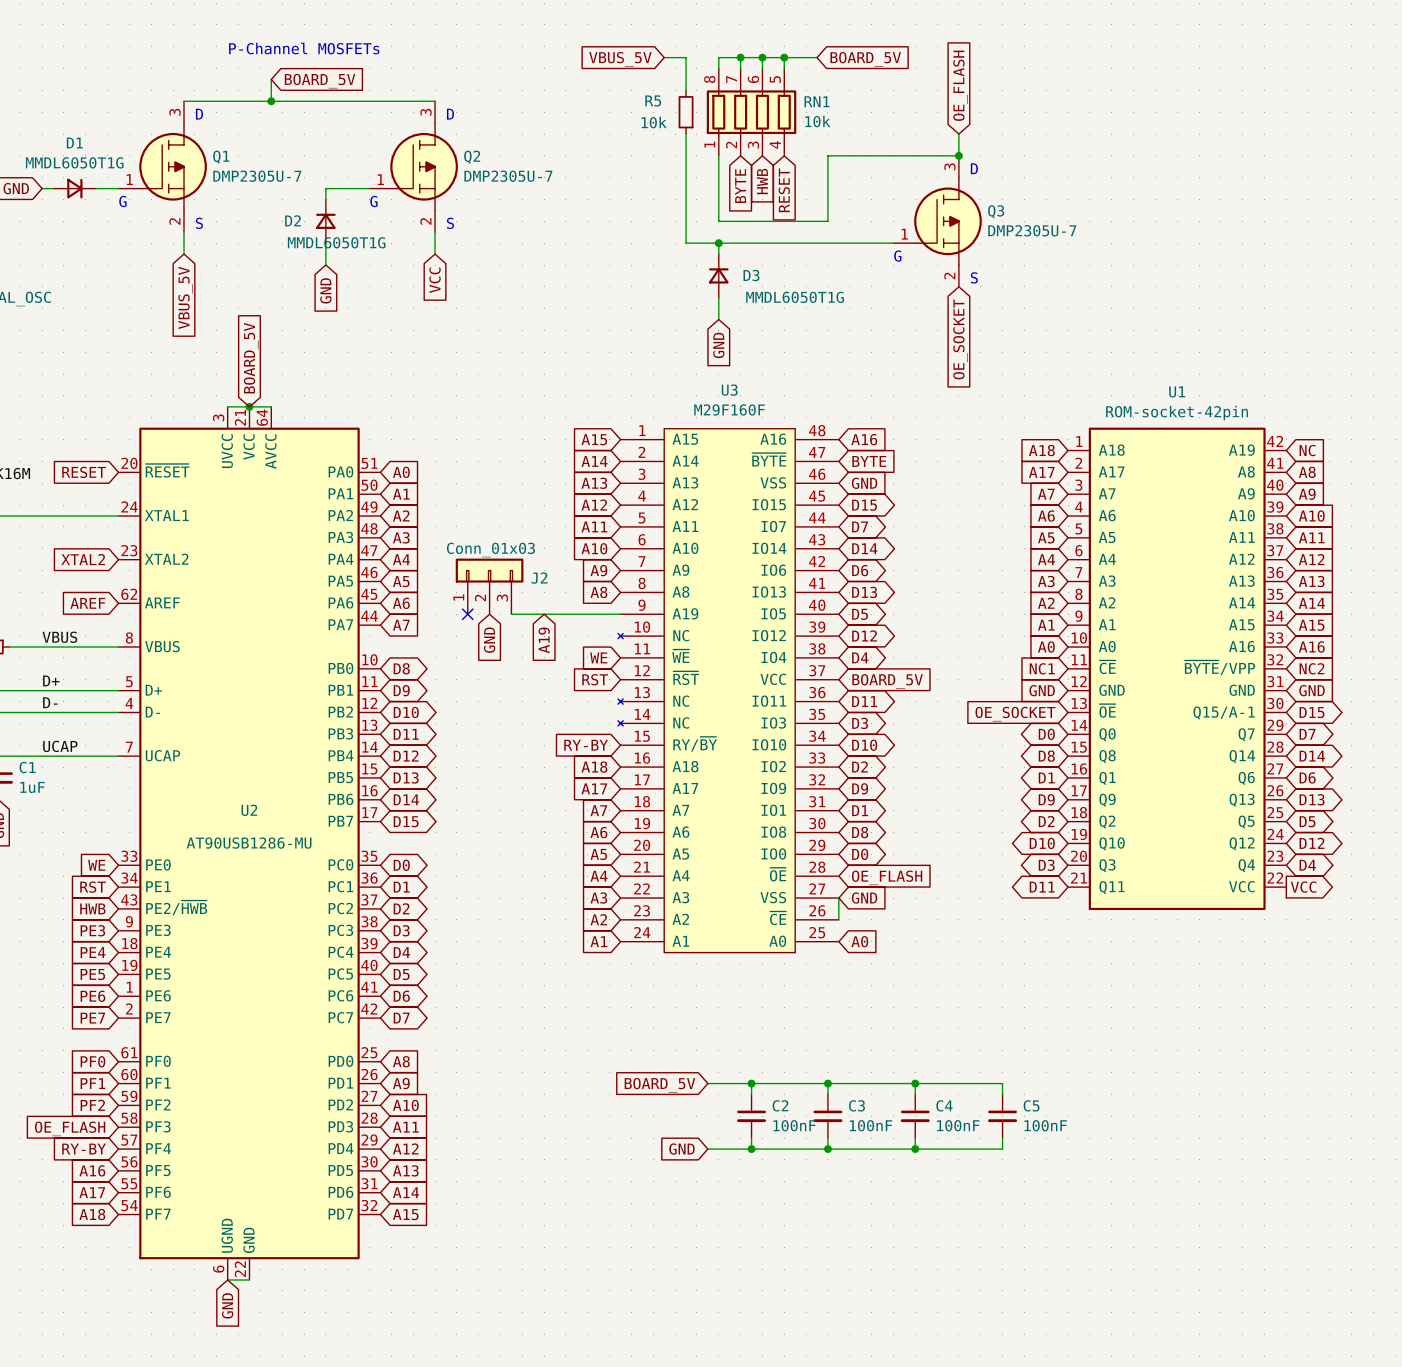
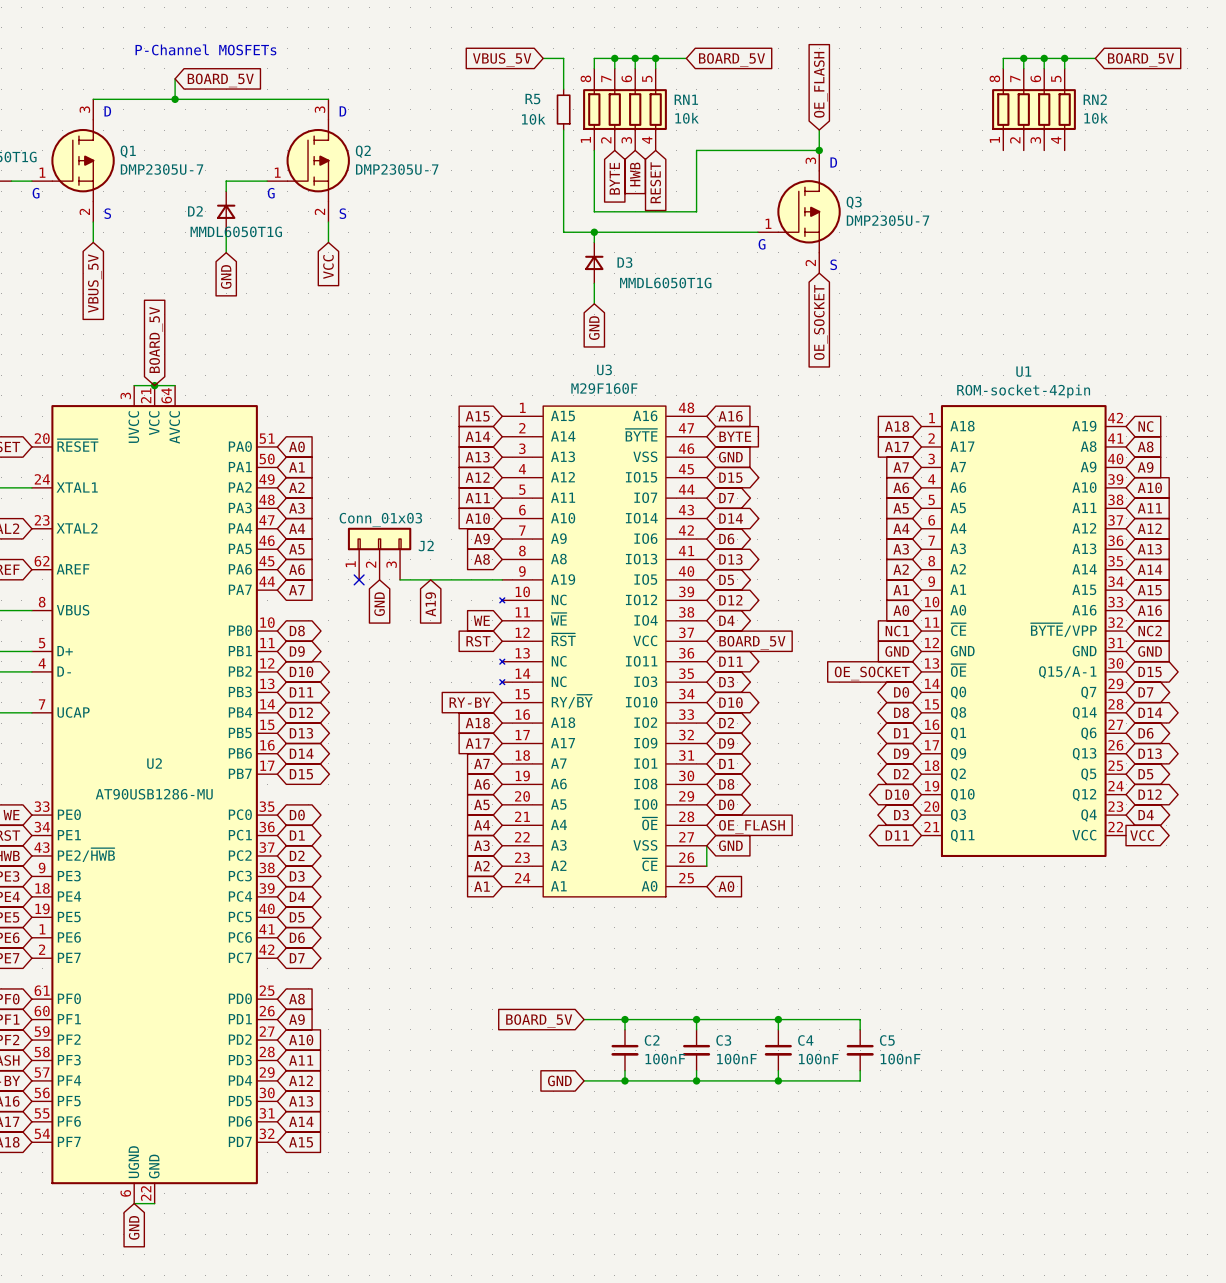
wire: none -> (1023, 58) (1023, 68)
junction: none -> (1023, 58)
wire: none -> (1044, 58) (1044, 68)
junction: none -> (1044, 58)
wire: none -> (1064, 58) (1064, 68)
junction: none -> (1064, 58)
wire: none -> (1095, 58) (1003, 58) (1003, 68)
global label: none -> BOARD_5V (1140, 59)
RN2: none -> 10k (1033, 109)

